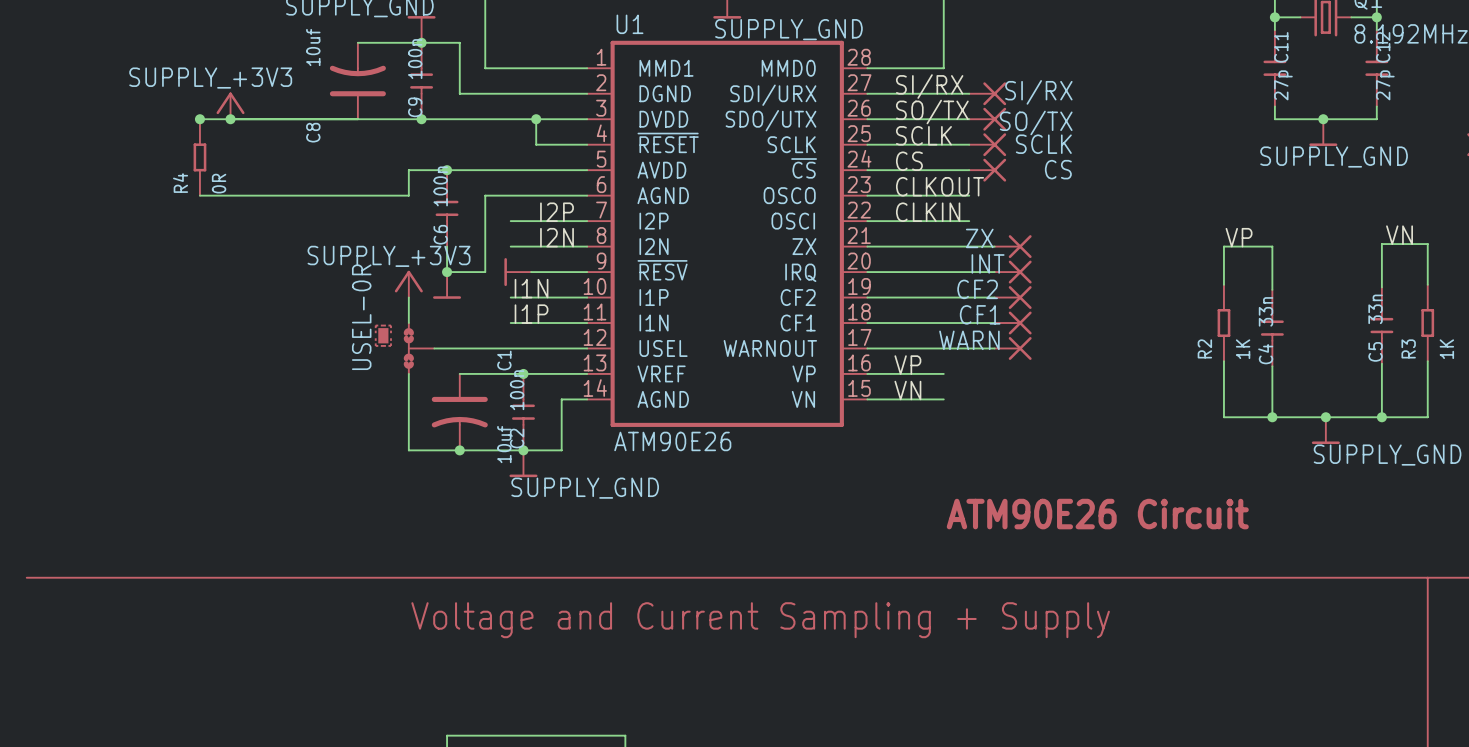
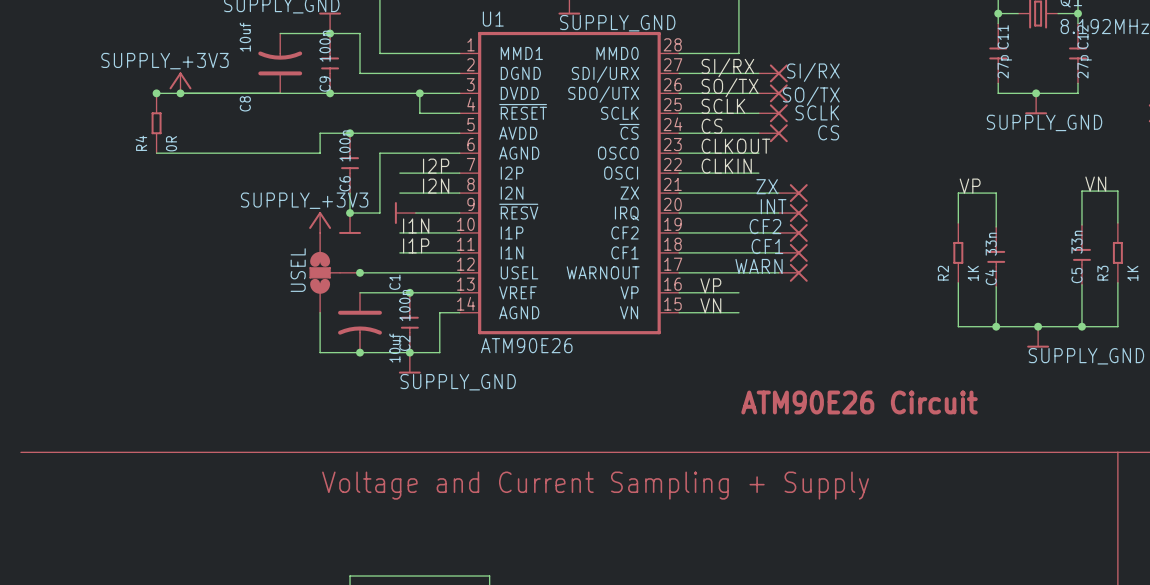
part: (383, 335) -> none
USEL-0R: (419, 348) -> none
USEL: none -> (334, 272)
junction: none -> (360, 272)

